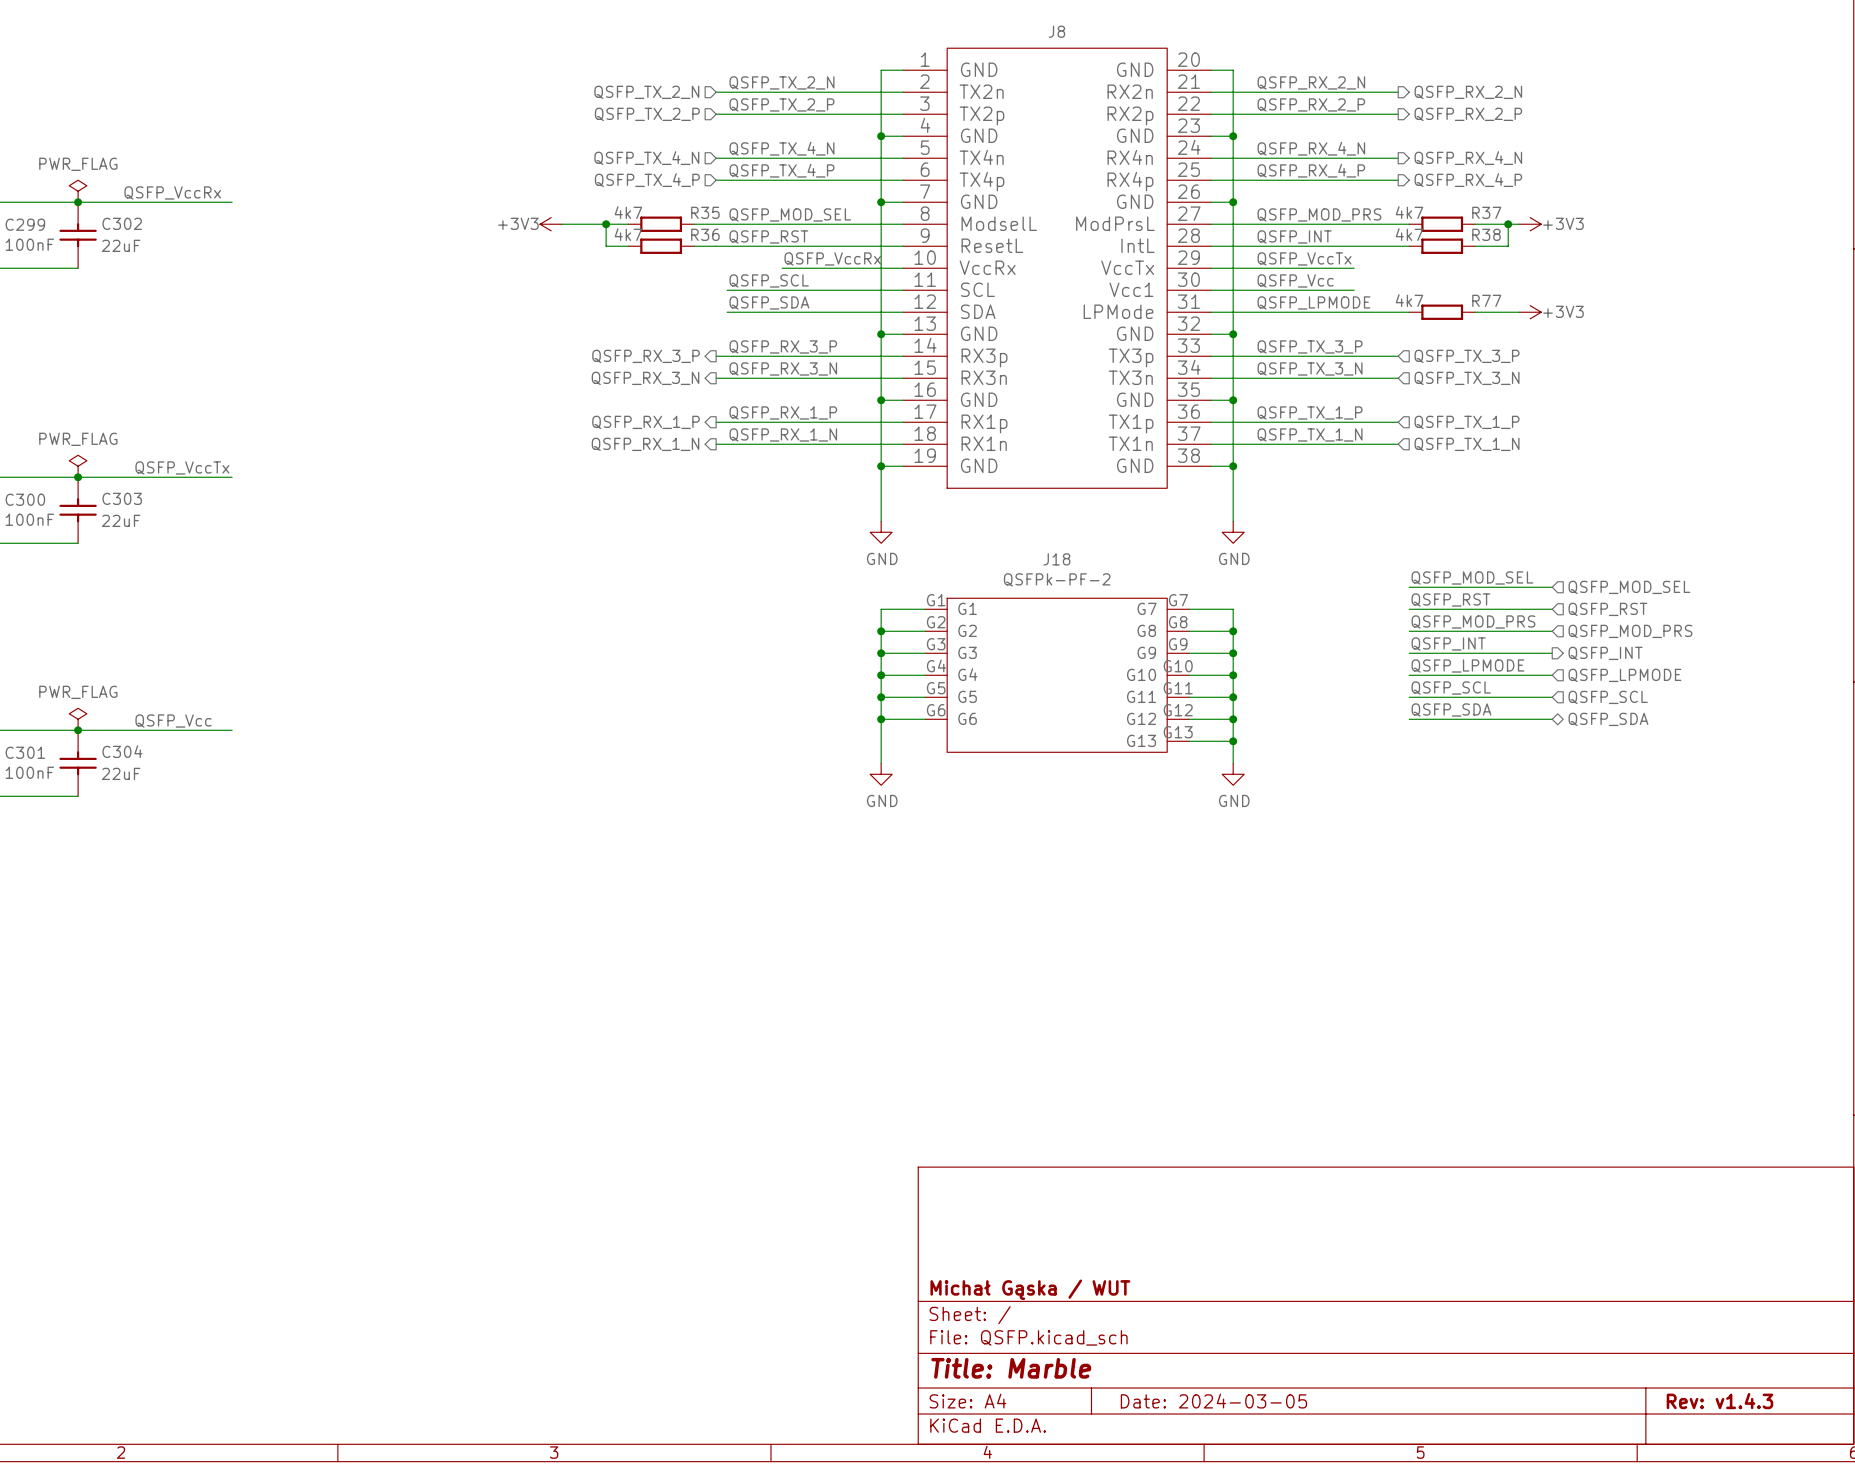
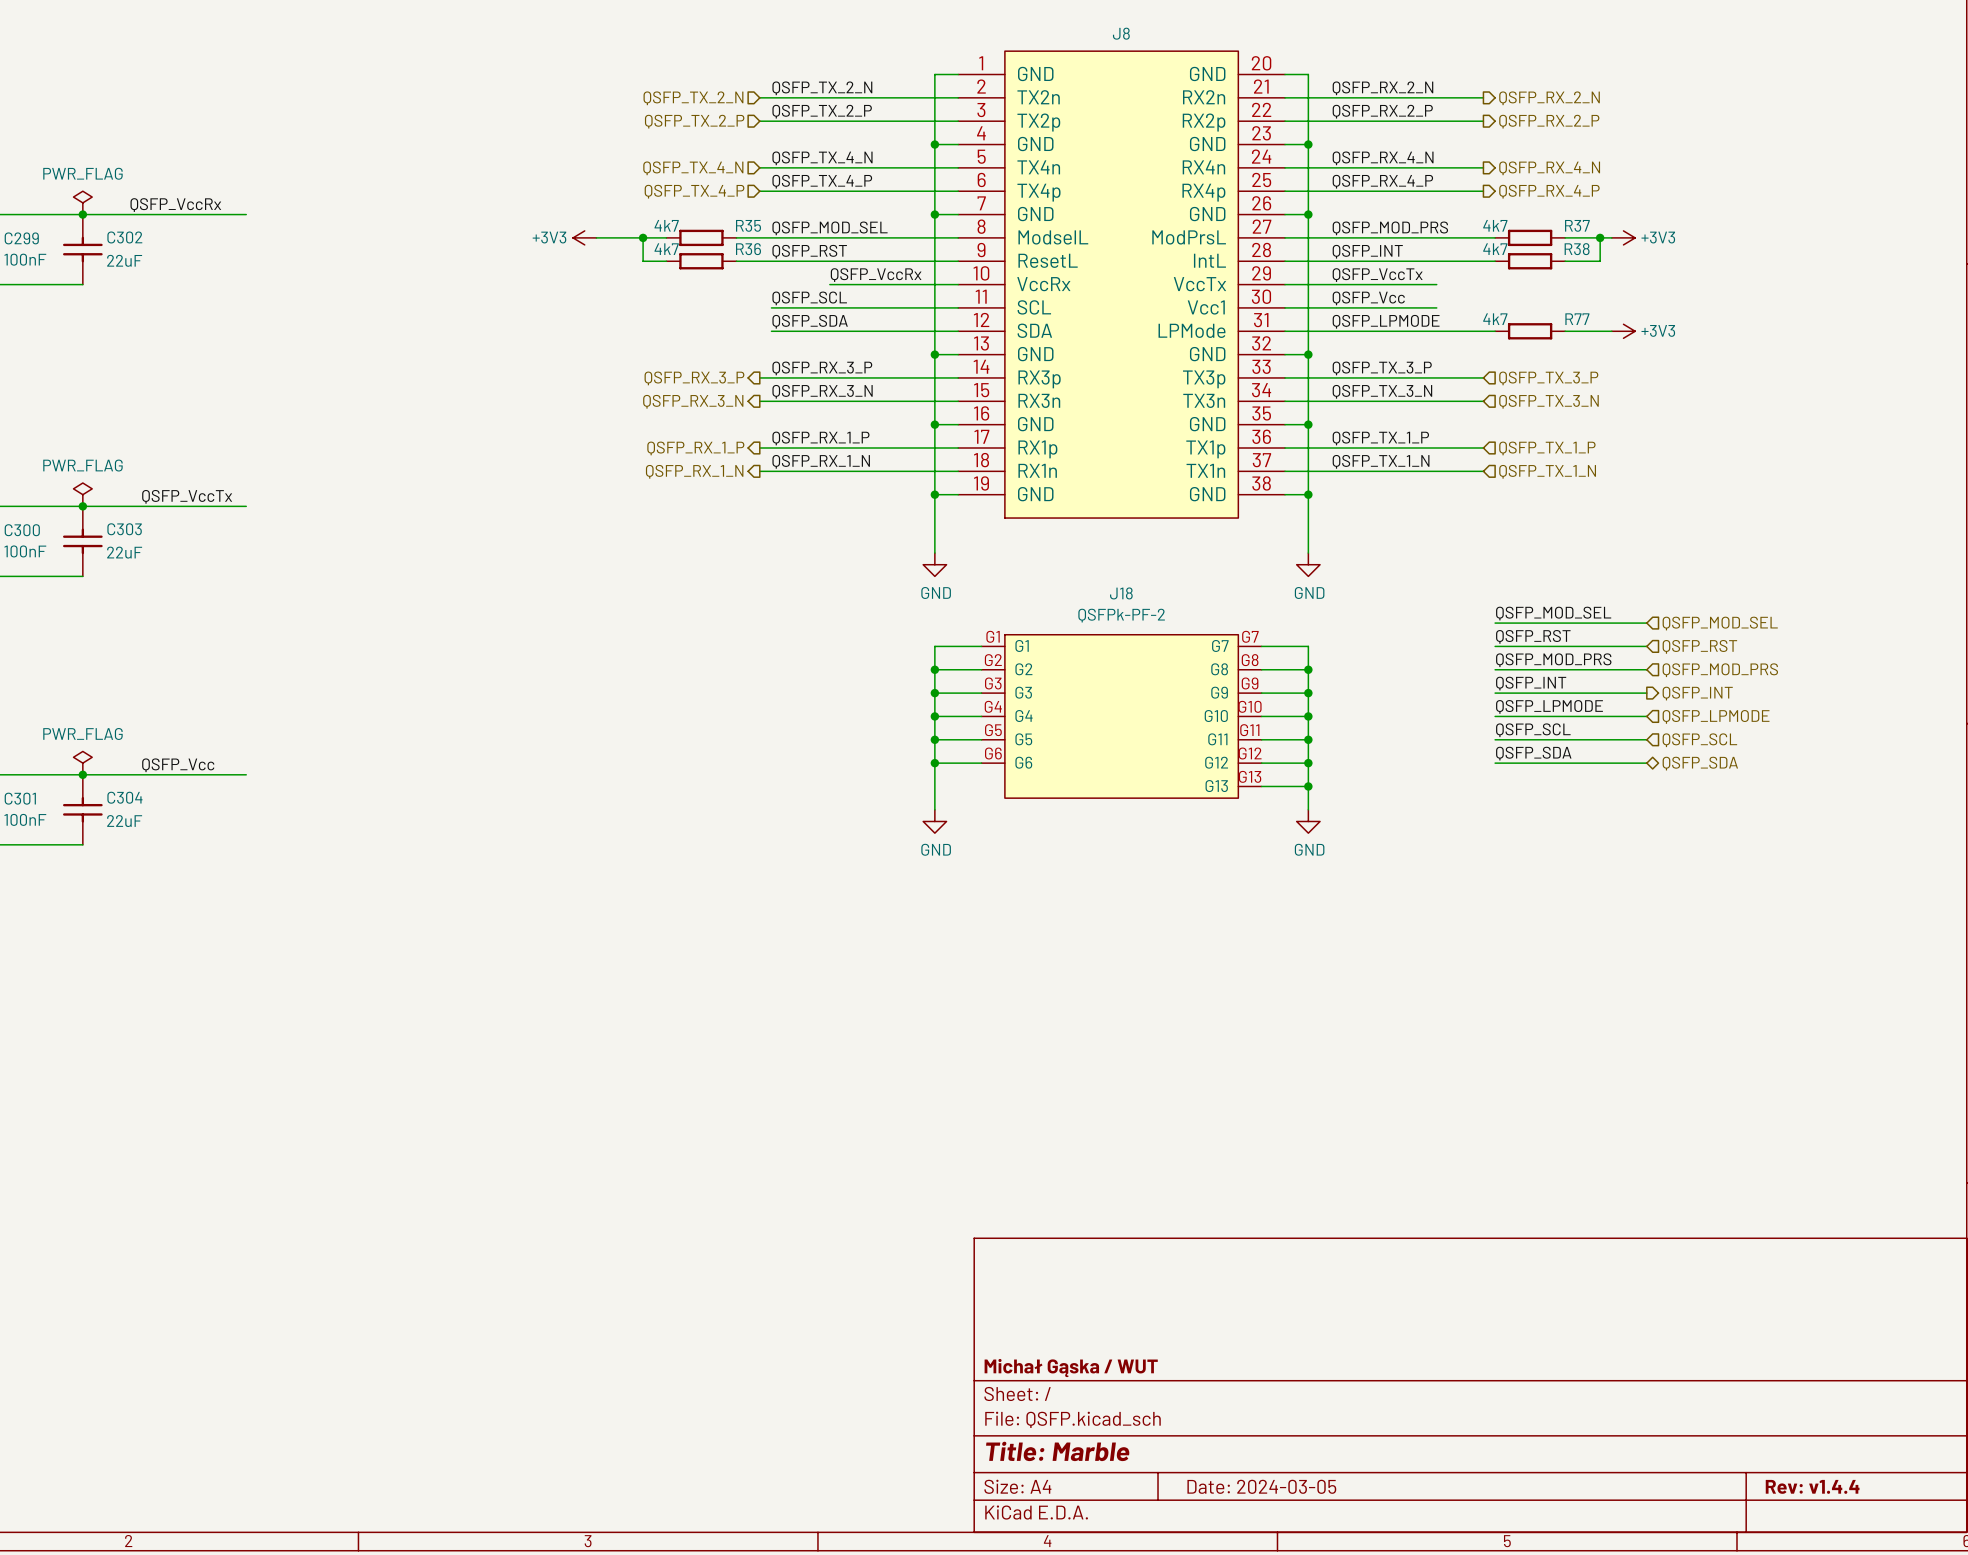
title block: Rev: v1.4.3 (1719, 1401) -> Rev: v1.4.4 (1812, 1486)

